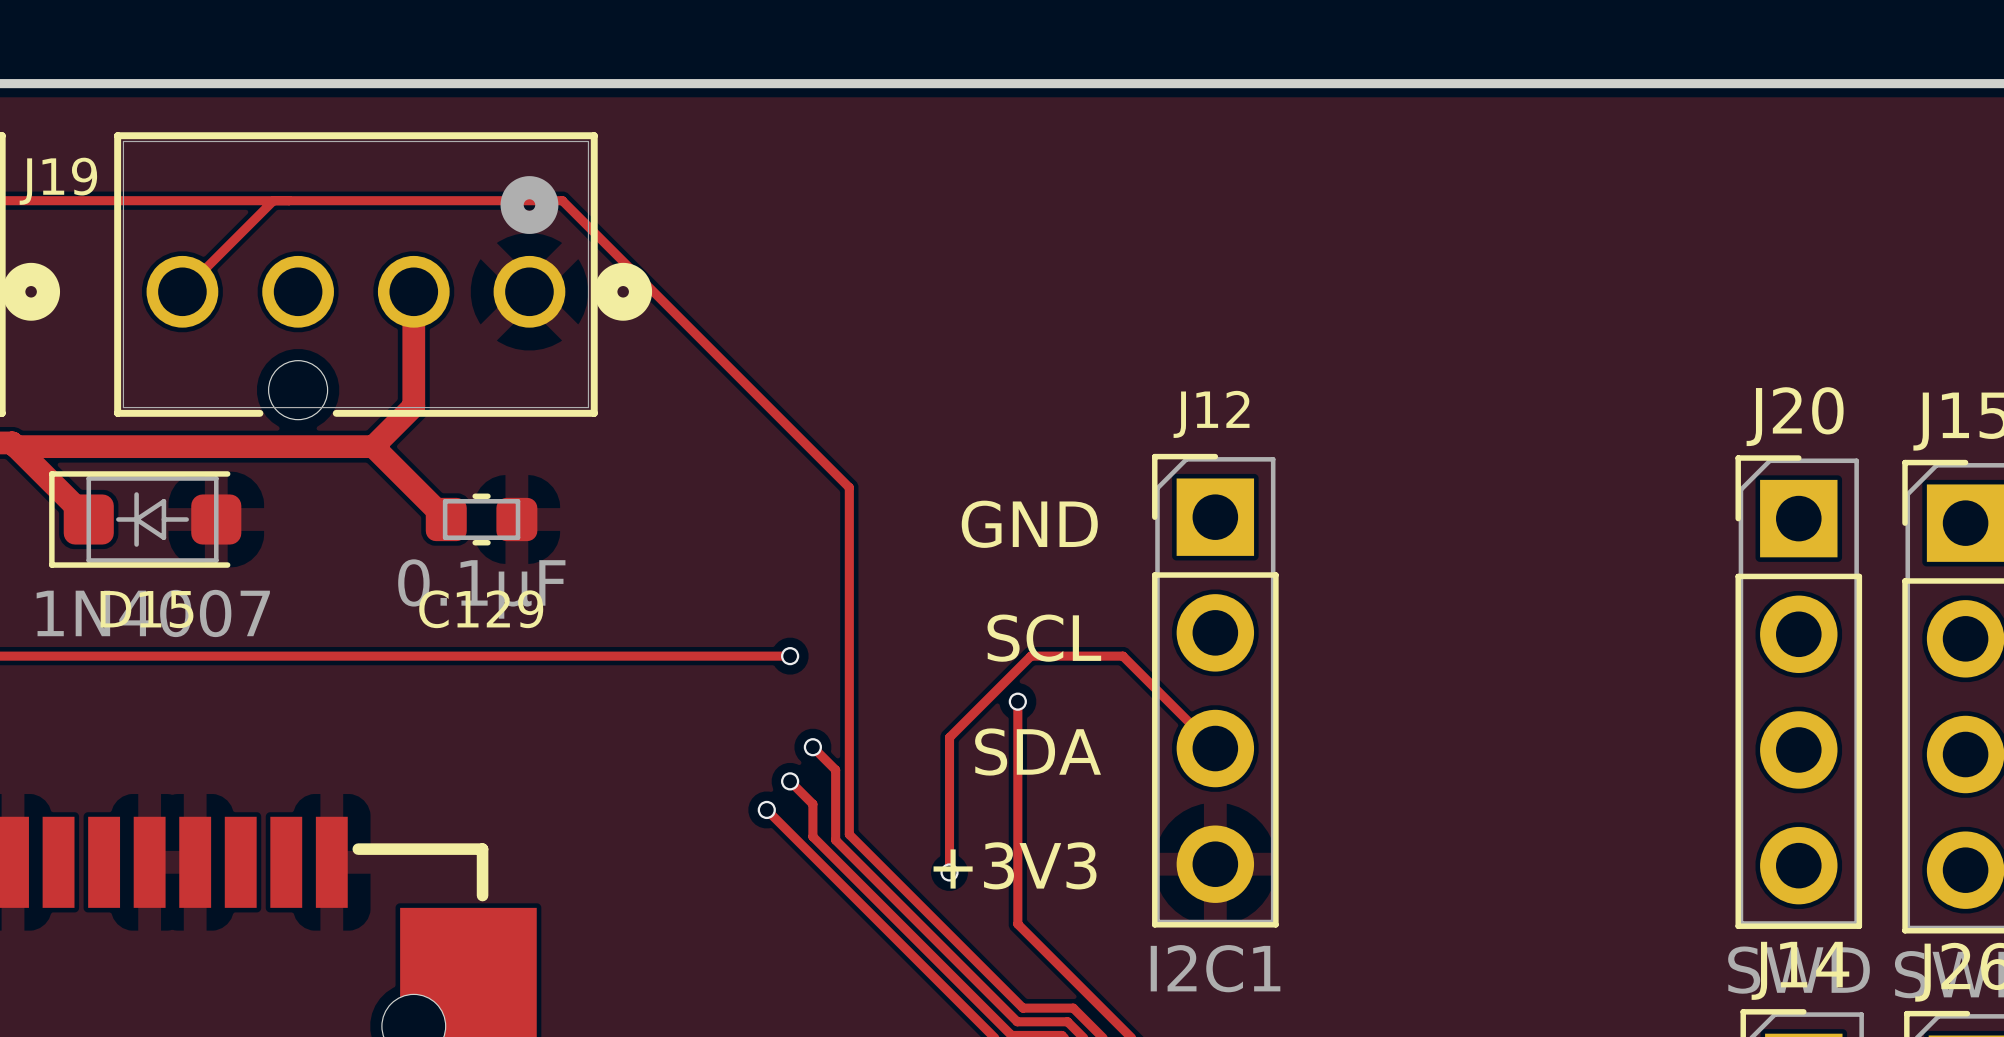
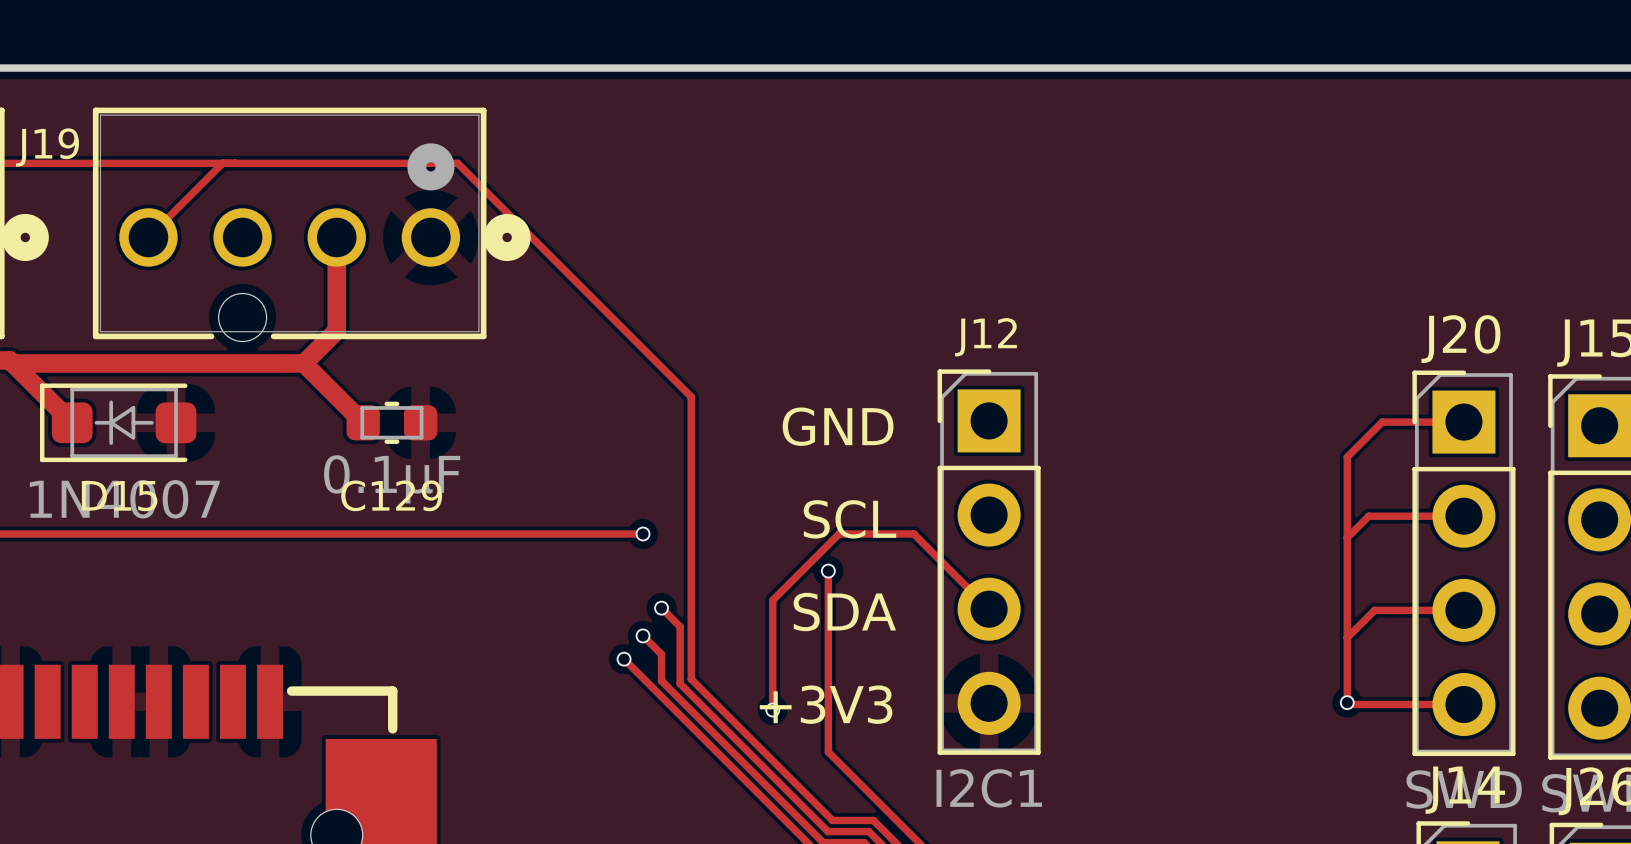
track: none -> (1463, 422) (1382, 422) (1347, 457) (1347, 702) (1349, 704) (1463, 704)
track: none -> (1463, 516) (1368, 516) (1347, 537)
track: none -> (1463, 610) (1374, 610) (1347, 637)
via: none -> (1347, 702)

